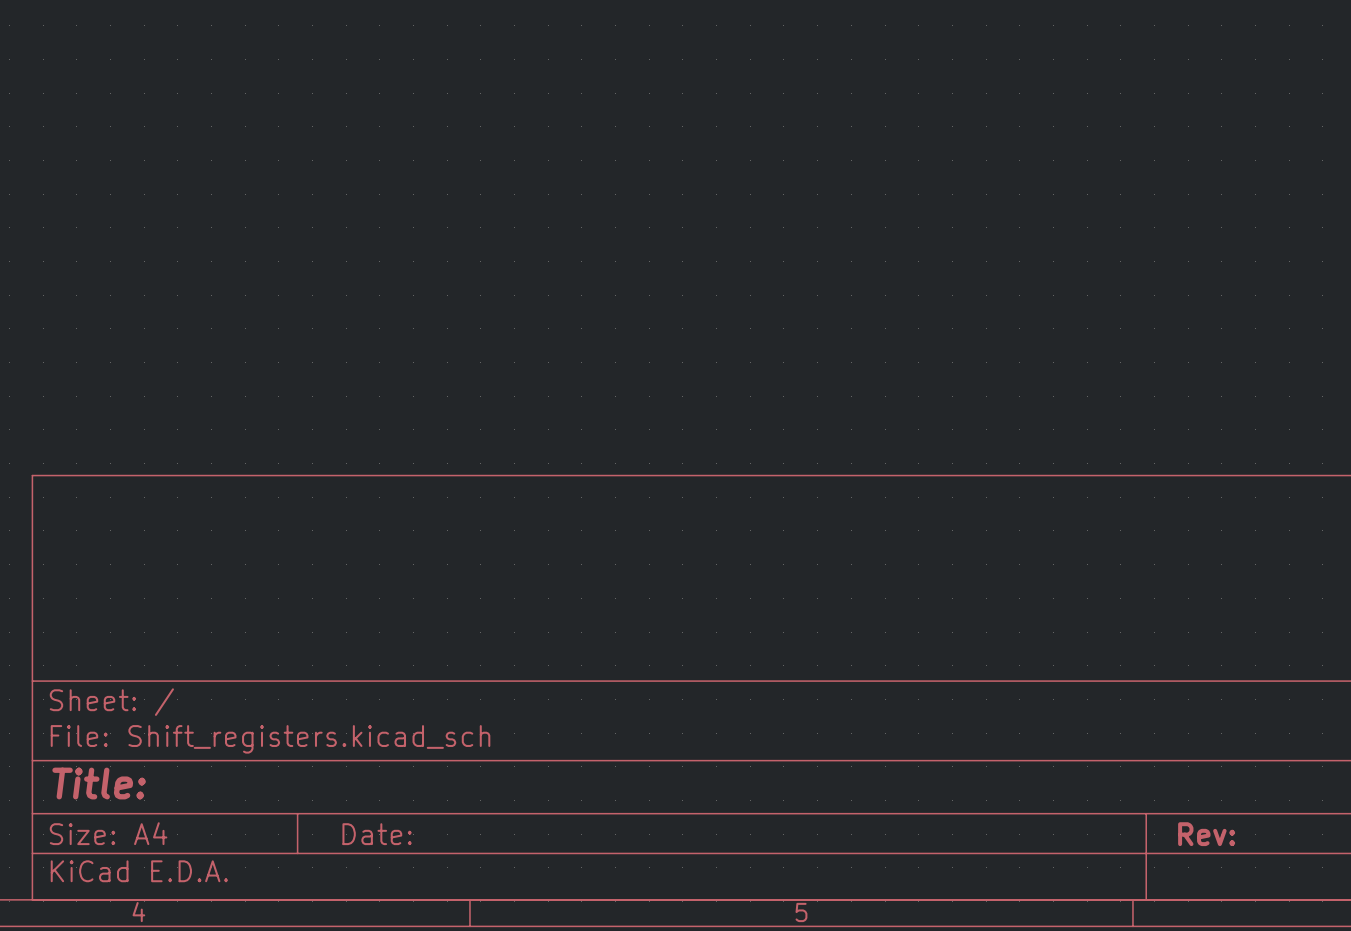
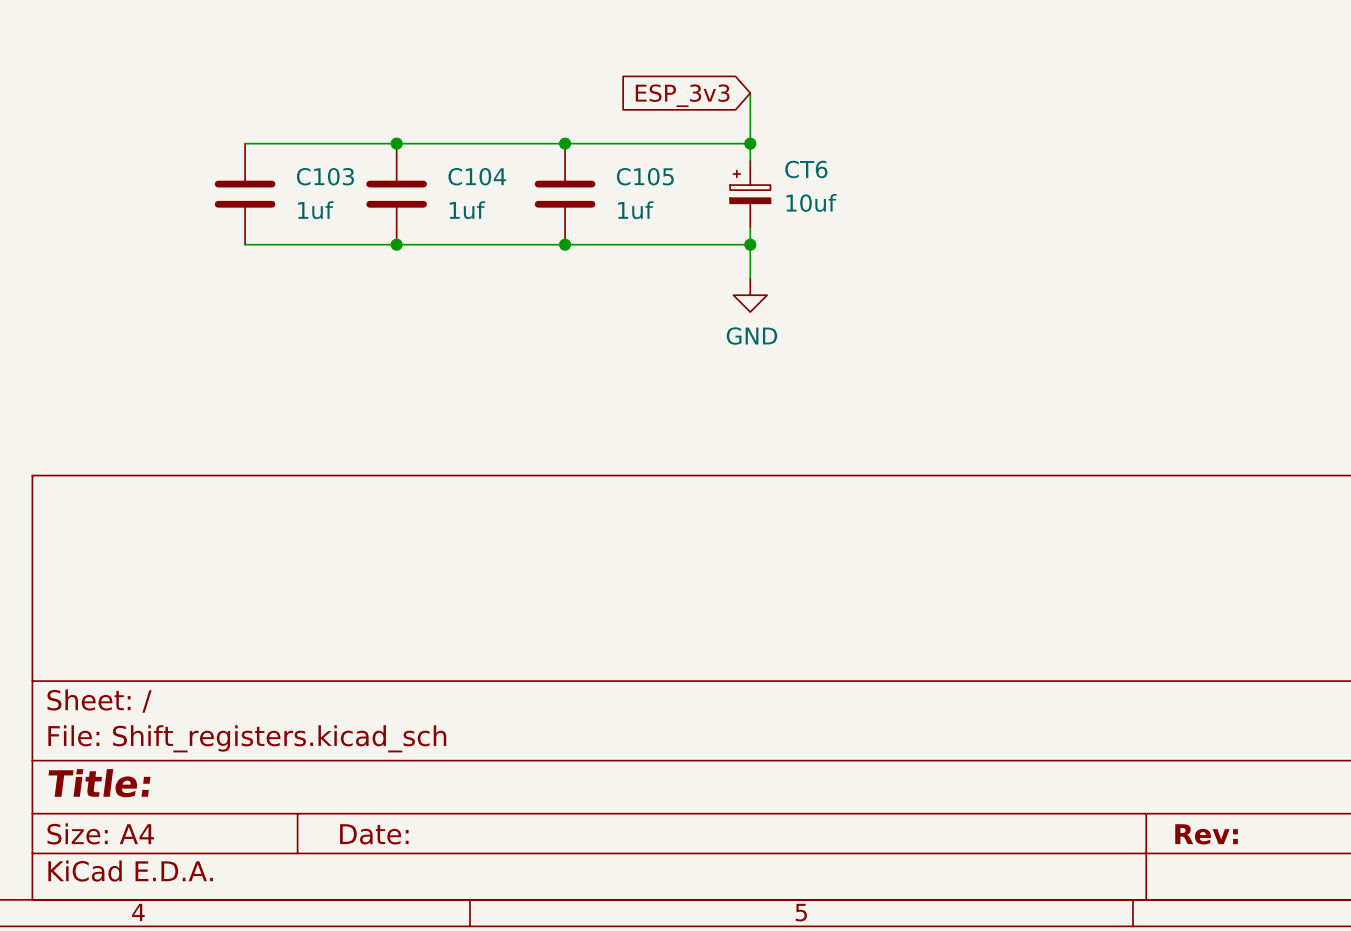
global label: none -> ESP_3v3 (682, 95)
wire: none -> (750, 93) (750, 160)
wire: none -> (245, 143) (750, 143)
junction: none -> (396, 143)
junction: none -> (565, 143)
junction: none -> (750, 143)
C103: none -> 1uf (245, 194)
C104: none -> 1uf (396, 194)
C105: none -> 1uf (565, 194)
CT6: none -> 10uf (750, 194)
wire: none -> (750, 227) (750, 278)
wire: none -> (245, 244) (750, 244)
junction: none -> (396, 244)
junction: none -> (565, 244)
junction: none -> (750, 244)
power symbol: none -> GND (750, 295)

